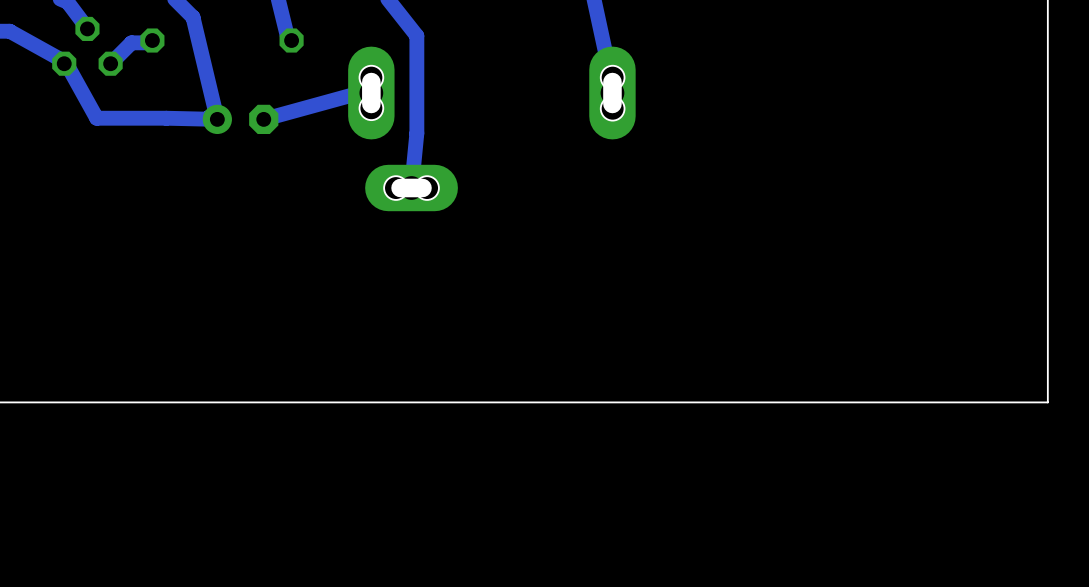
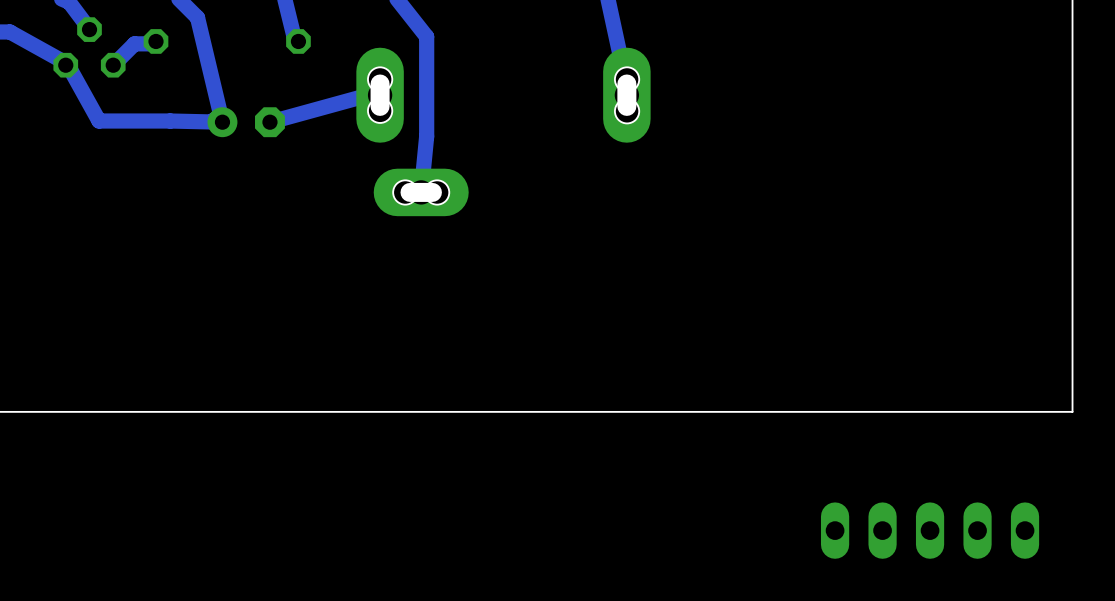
part: none -> (930, 530)

